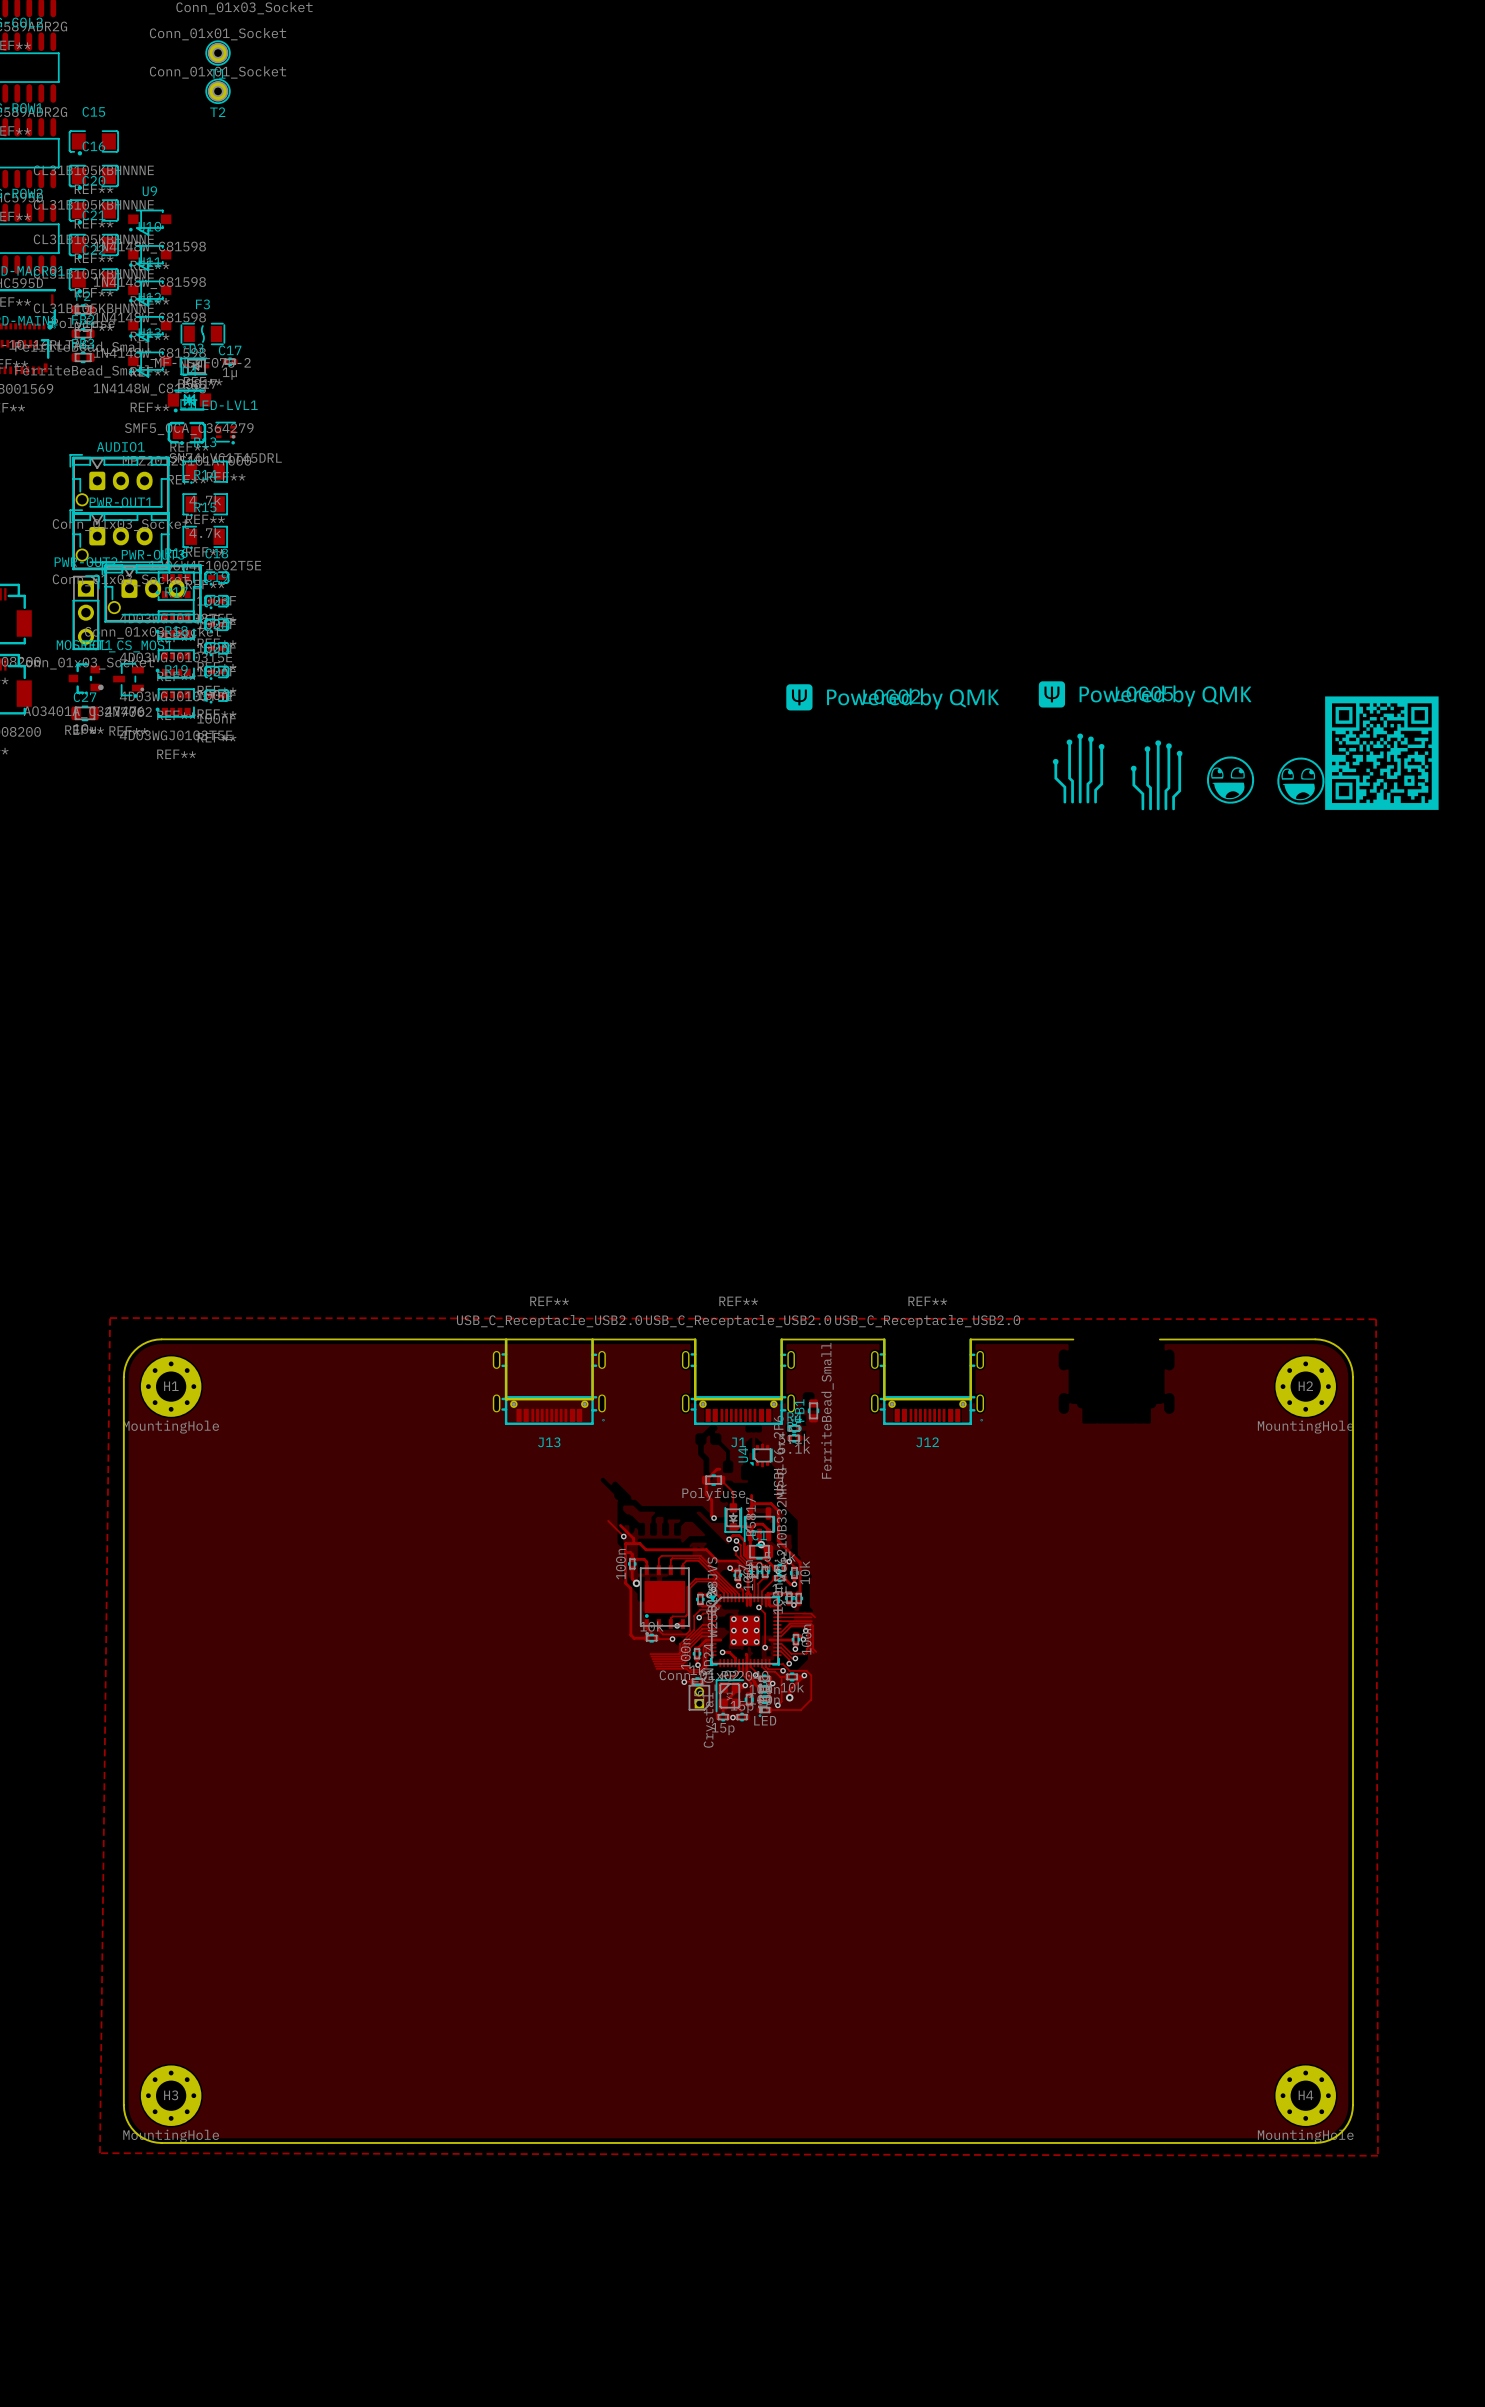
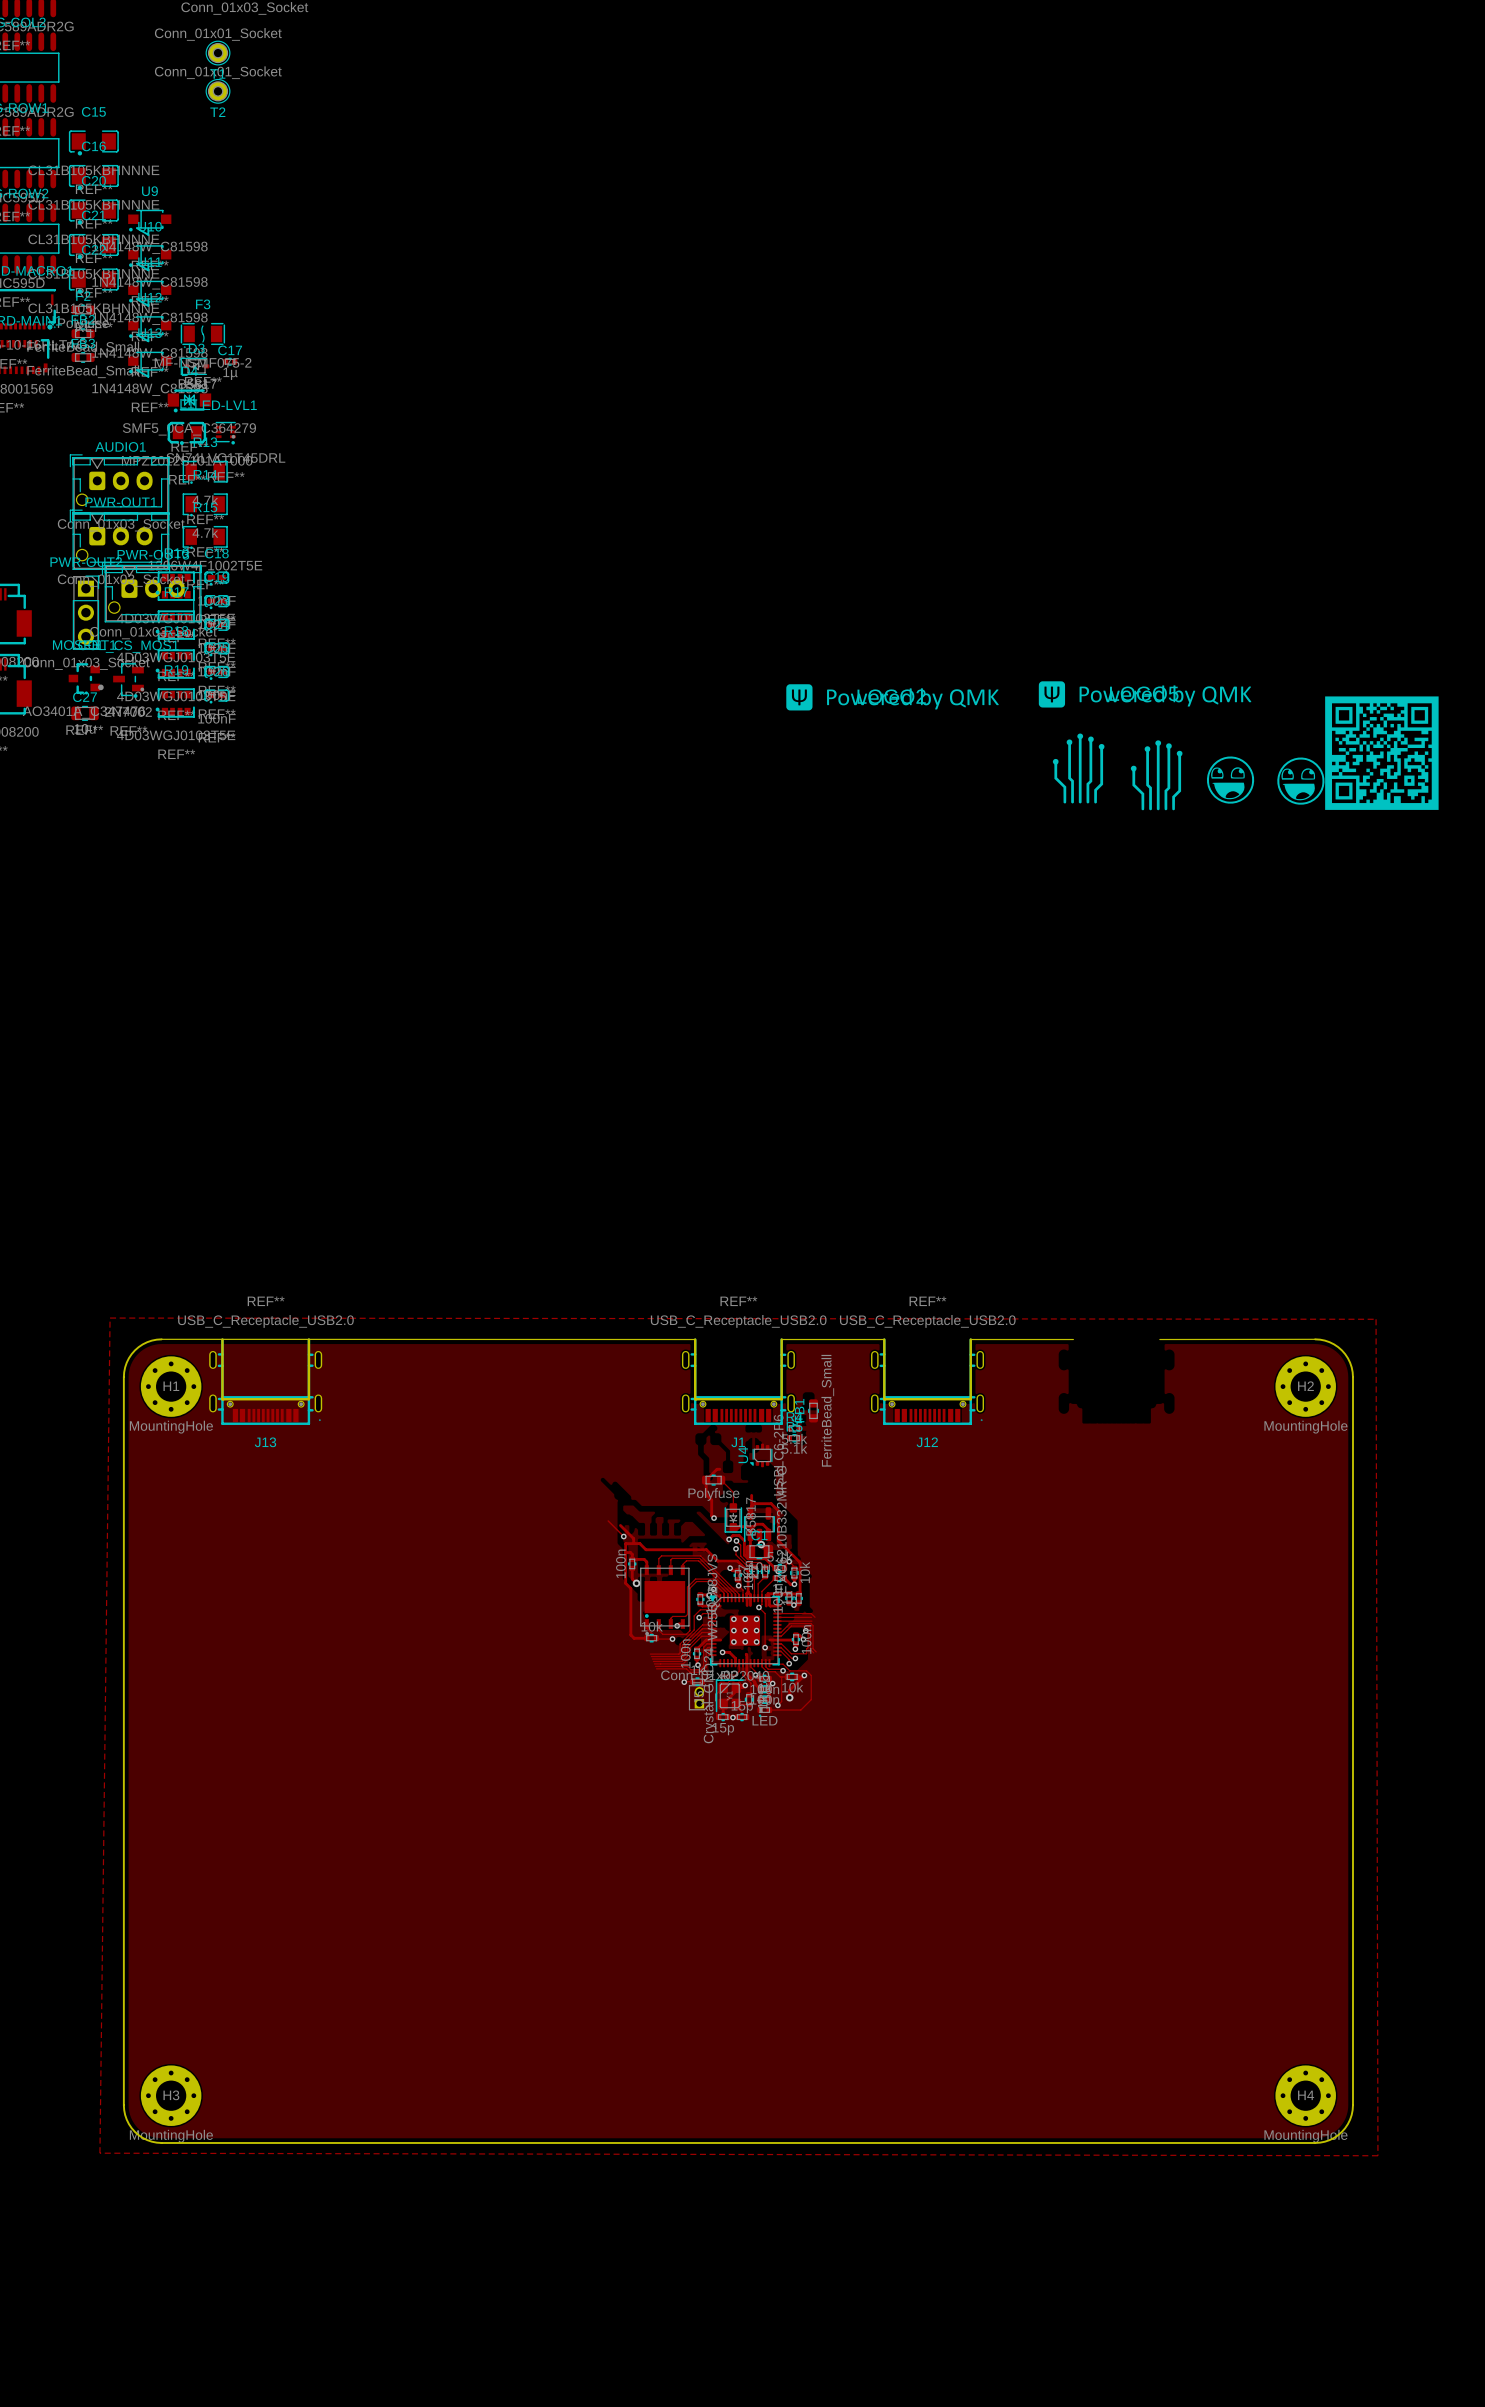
J13 position: (549, 1381) -> (265, 1381)

